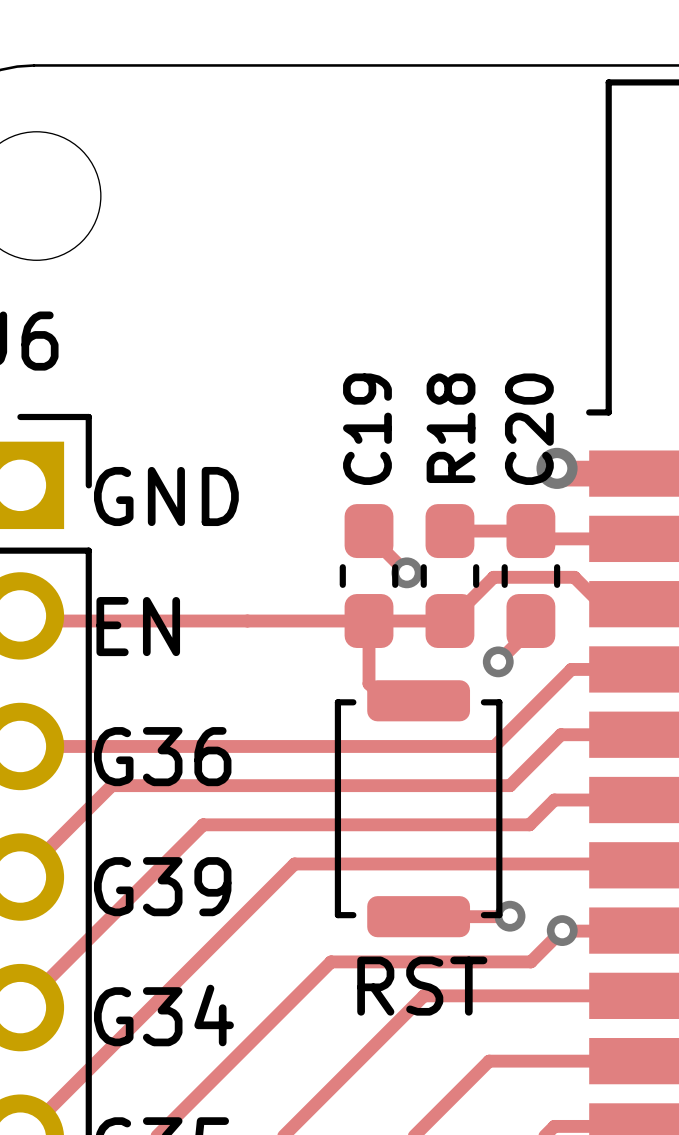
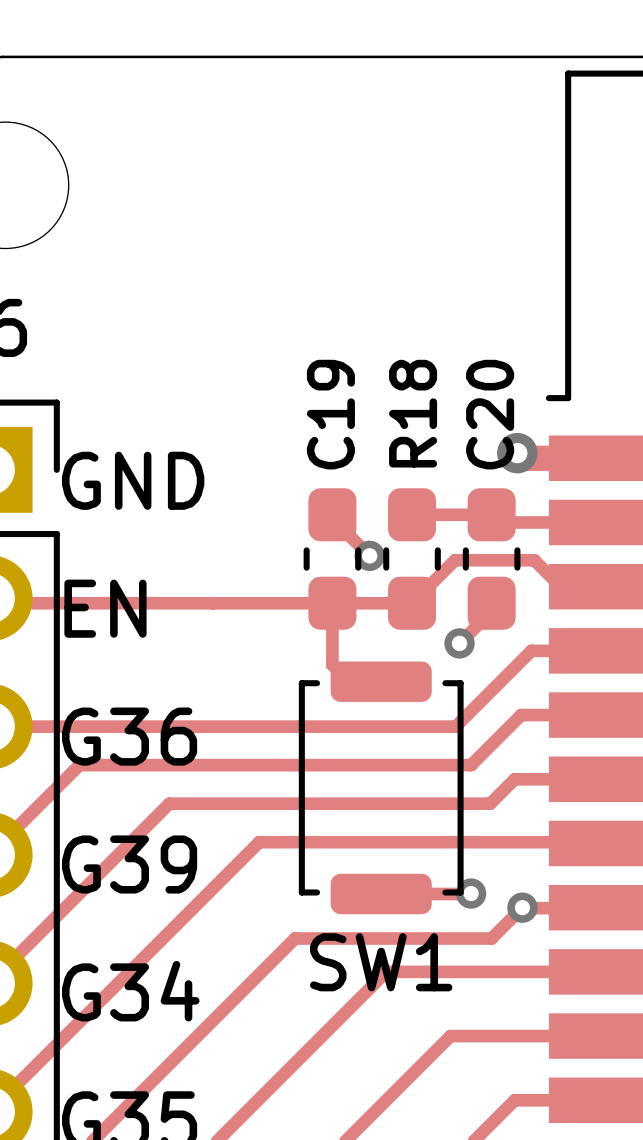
RST name: RST (422, 986) -> SW1 (381, 962)

